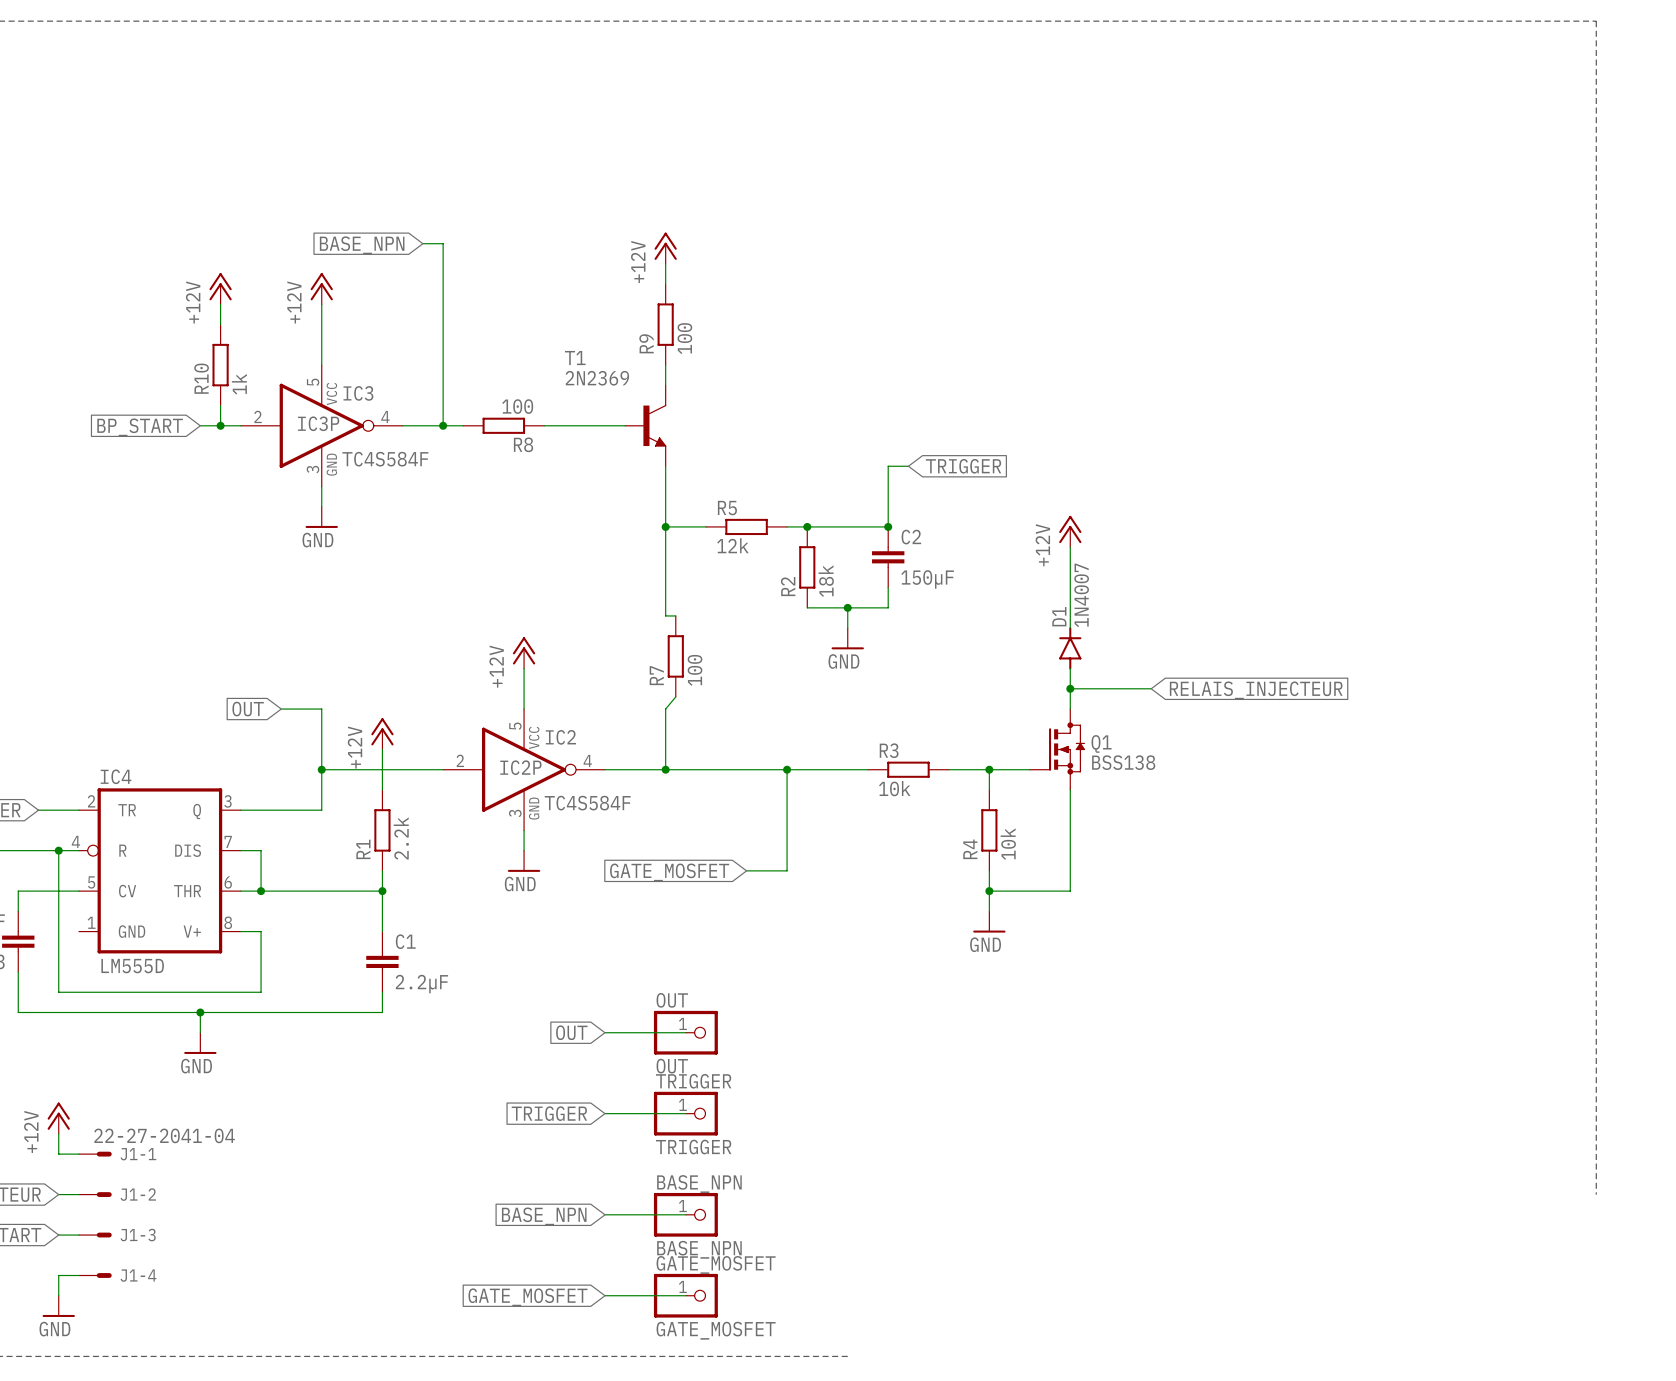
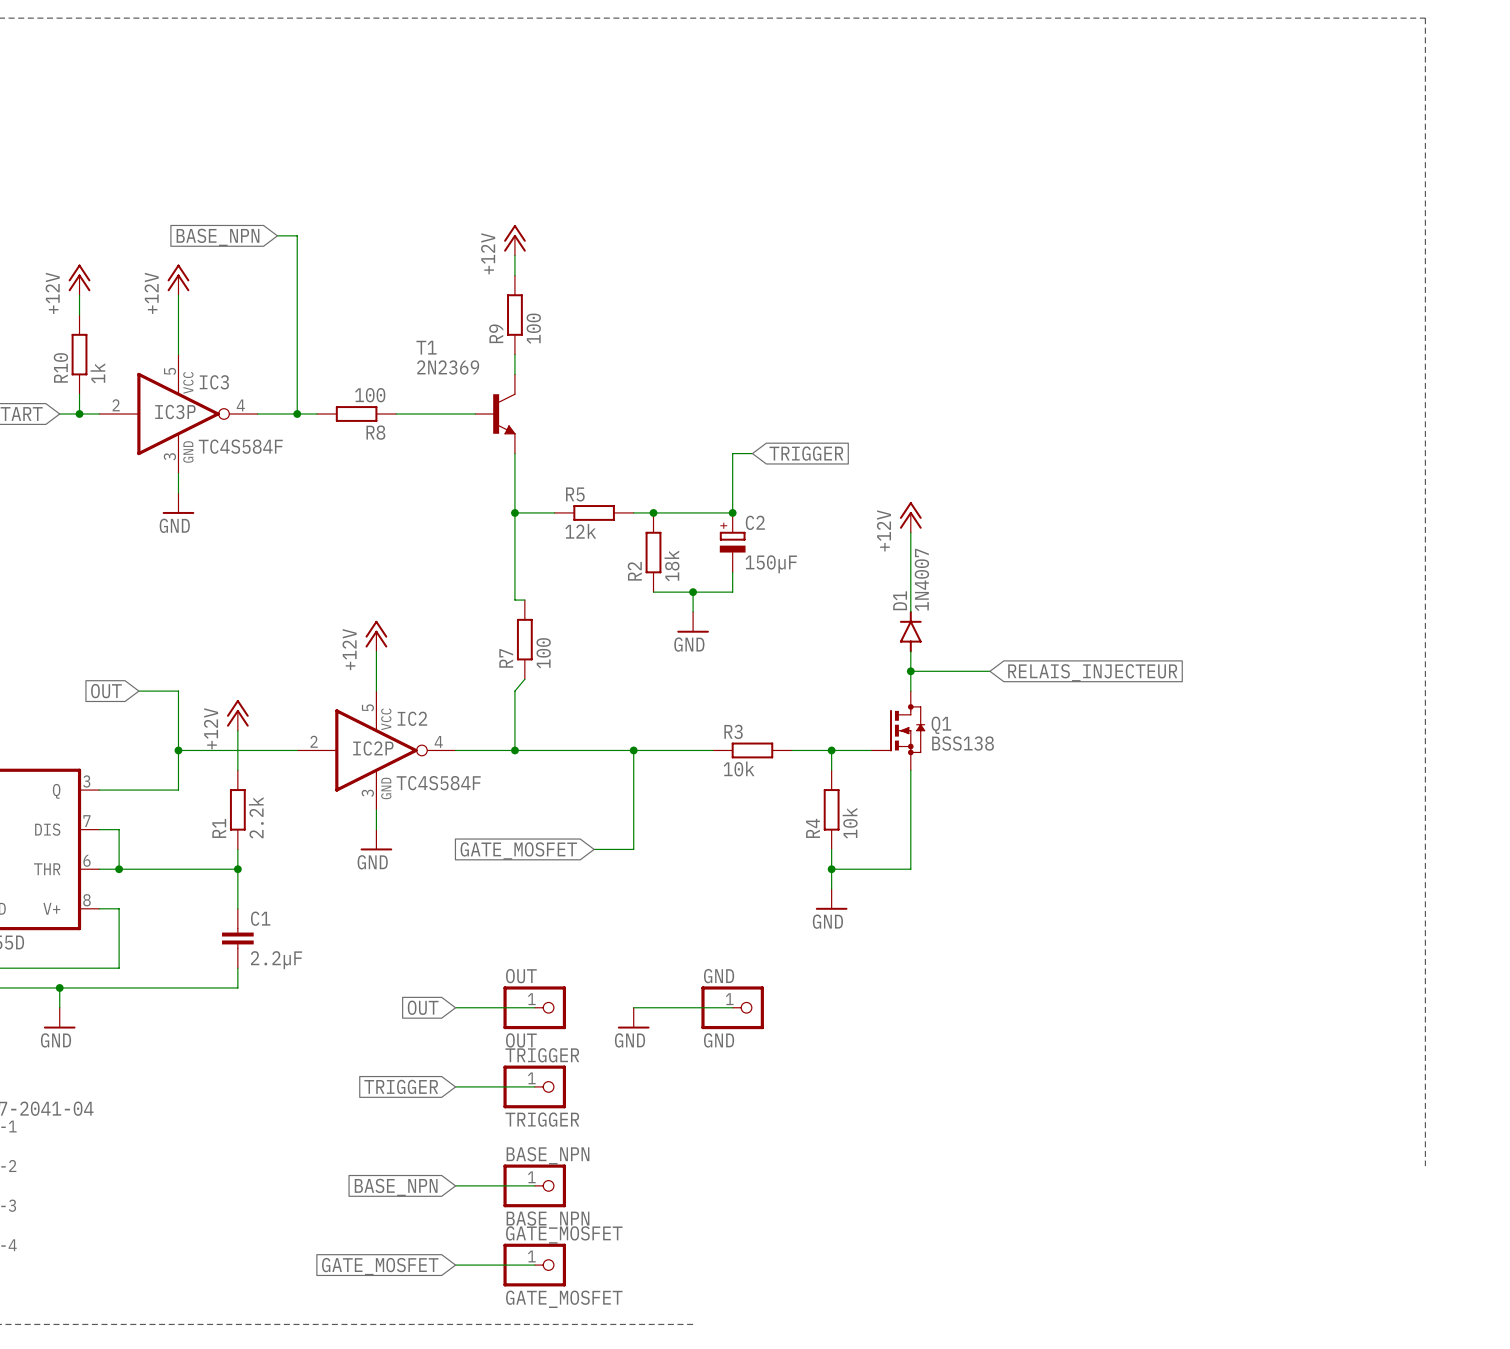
C2 symbol: [872, 526, 905, 588] -> [719, 512, 746, 573]
wire: none -> (633, 1007) (732, 1007)
GND: none -> GND (732, 1007)
power symbol: none -> GND (633, 1018)

